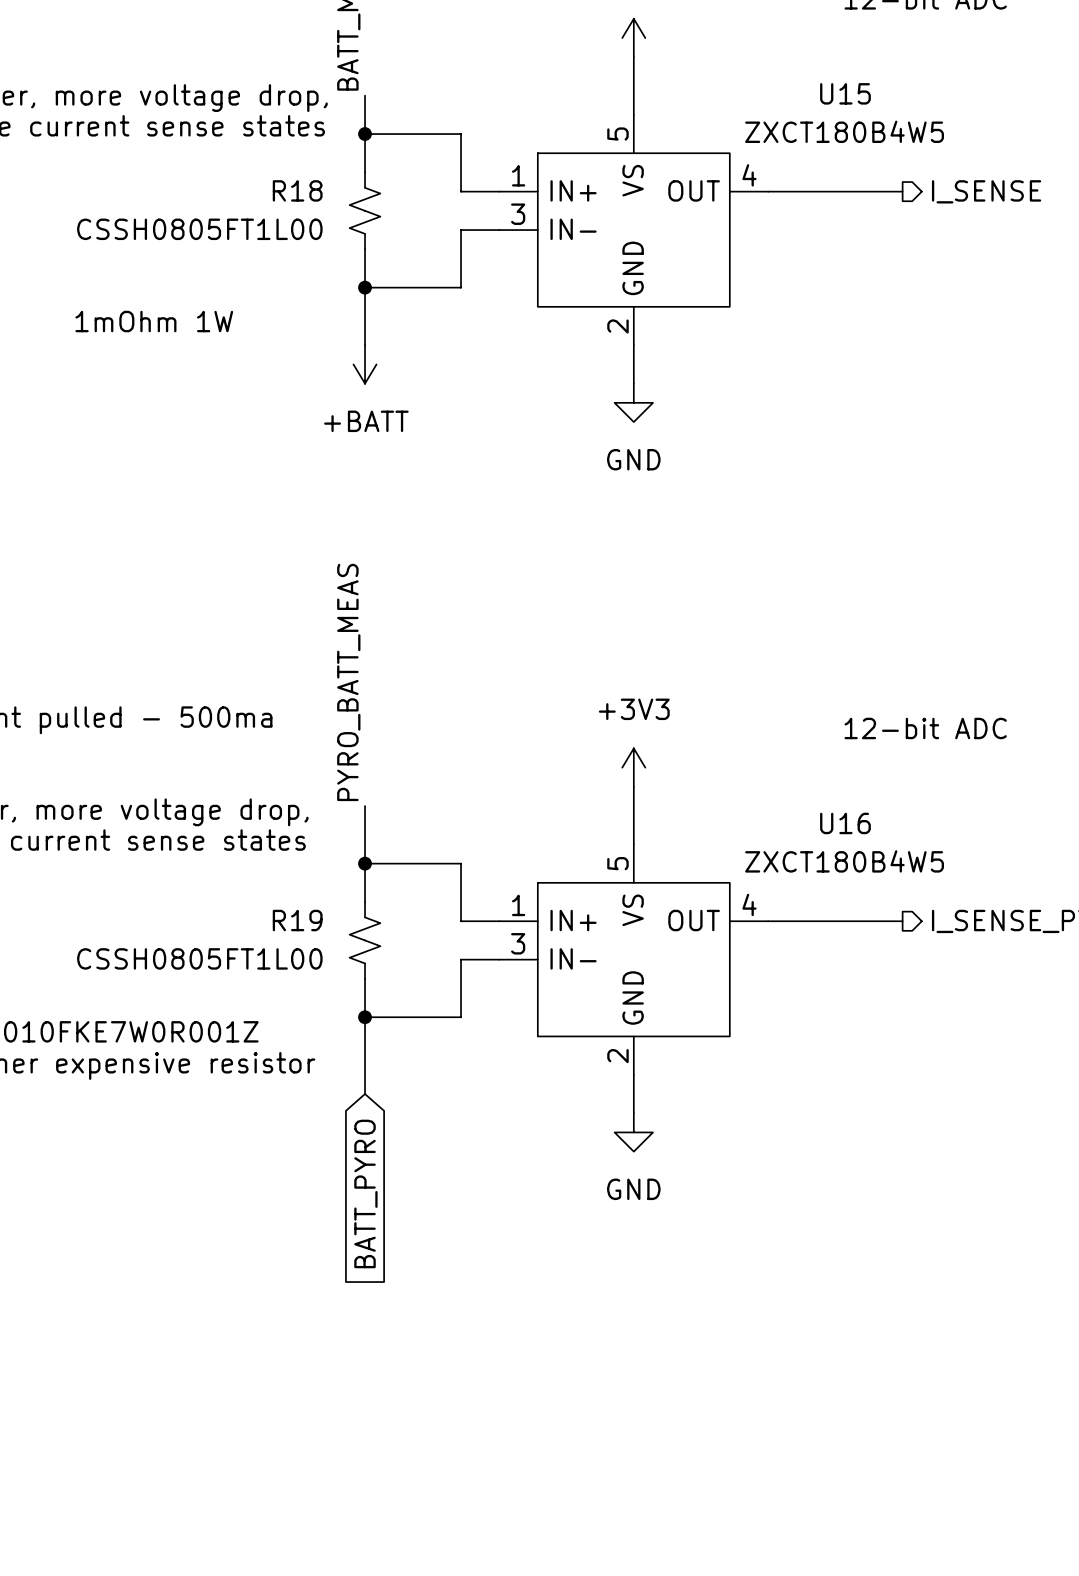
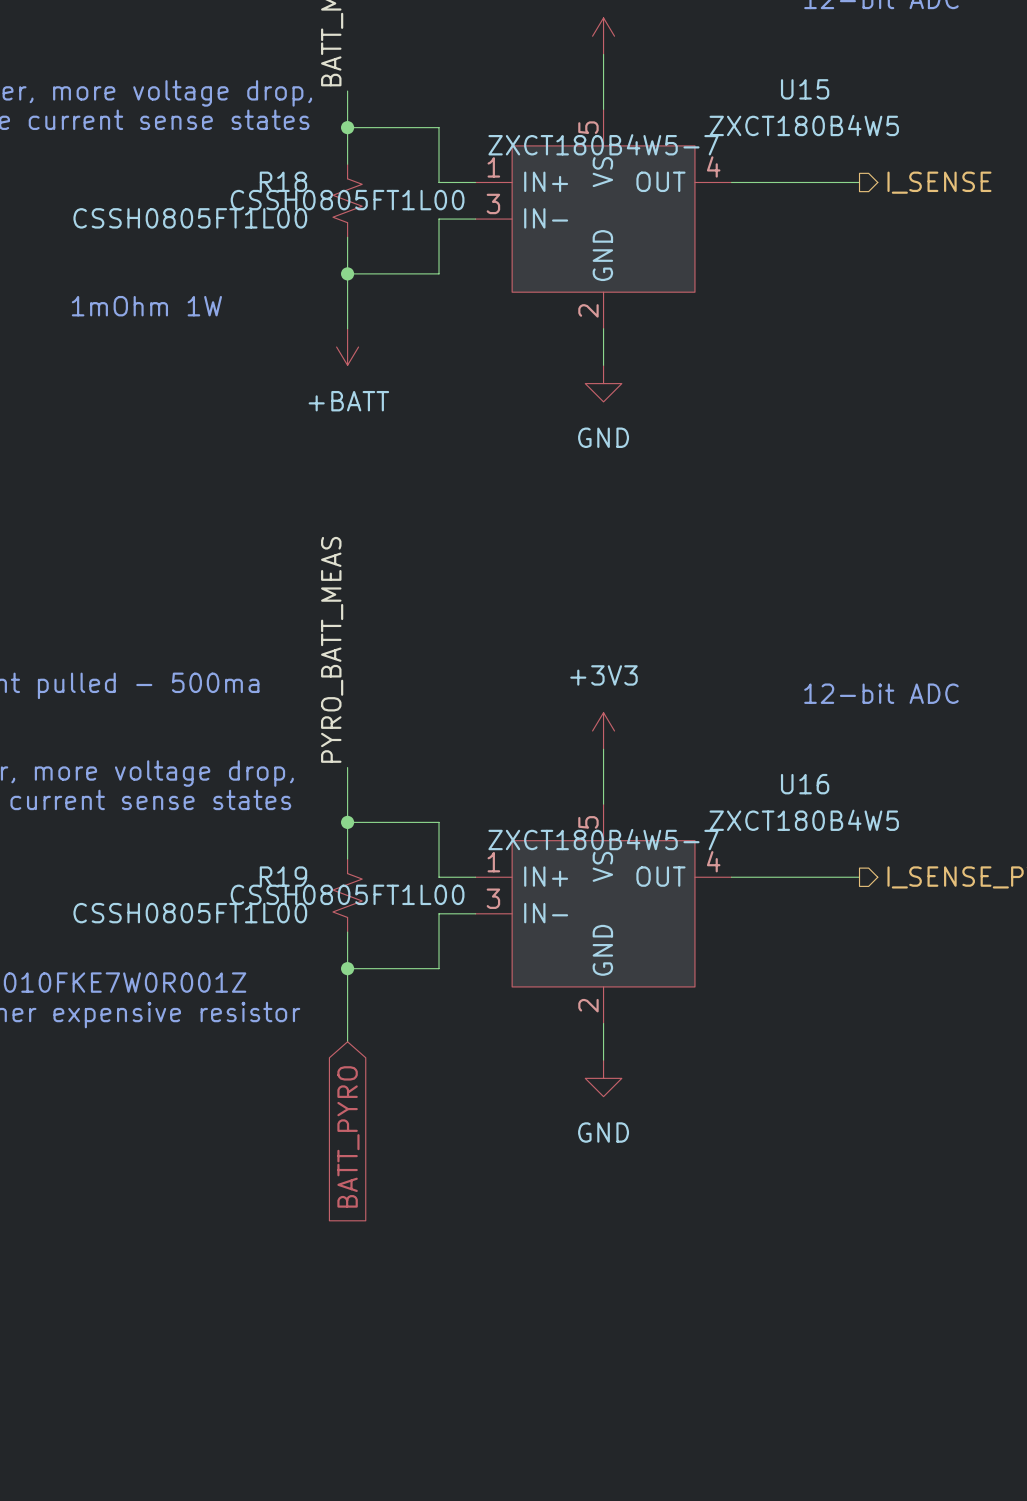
U15 text: none -> ZXCT180B4W5-7 (603, 144)
R18 text: none -> CSSH0805FT1L00 (347, 200)
U16 text: none -> ZXCT180B4W5-7 (603, 839)
R19 text: none -> CSSH0805FT1L00 (347, 894)

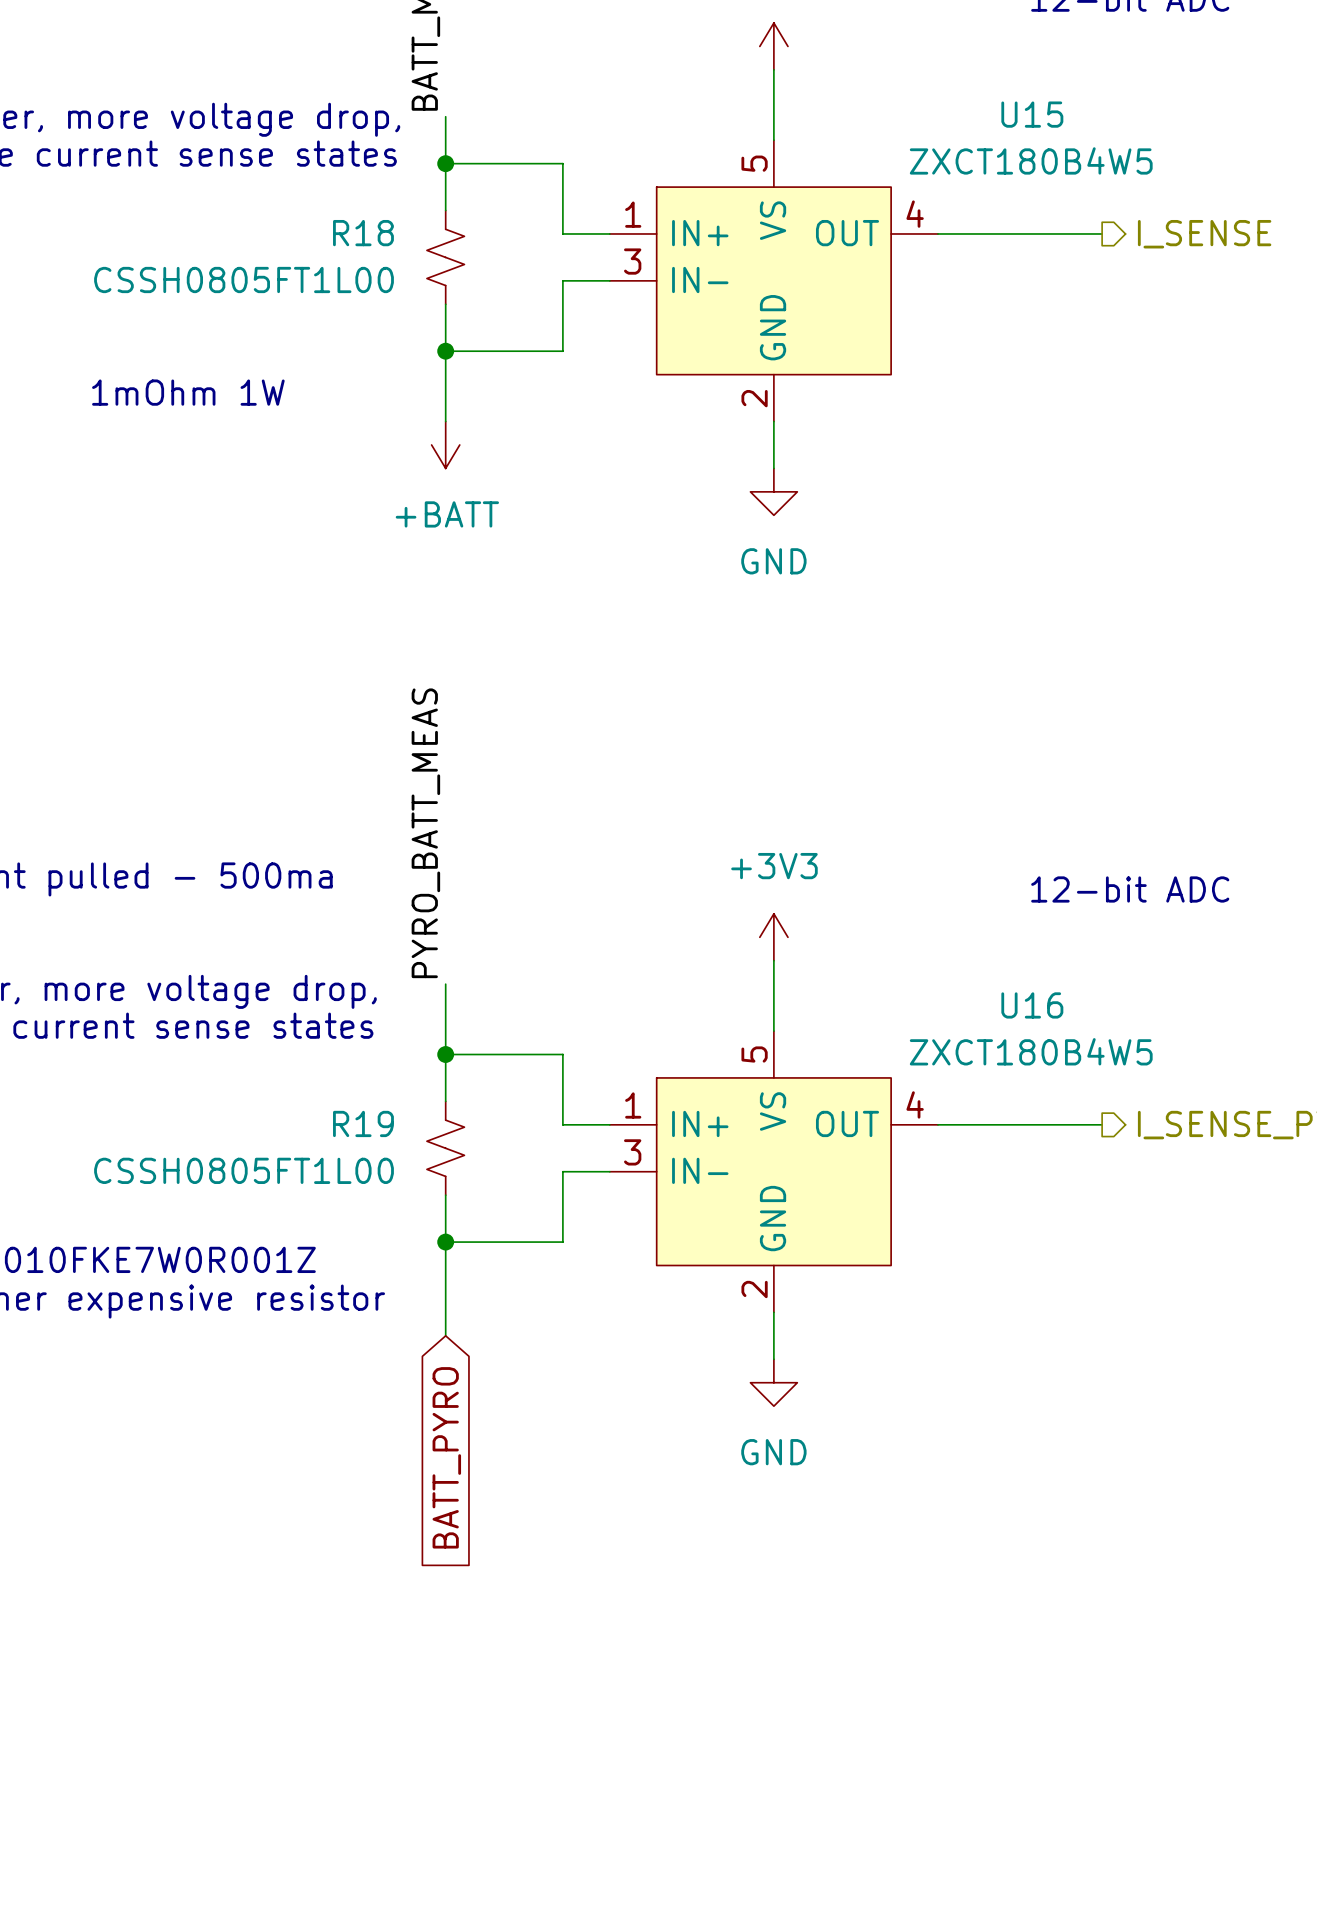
U15 text: ZXCT180B4W5-7 (603, 144) -> none
R18 text: CSSH0805FT1L00 (347, 200) -> none
U16 text: ZXCT180B4W5-7 (603, 839) -> none
R19 text: CSSH0805FT1L00 (347, 894) -> none

